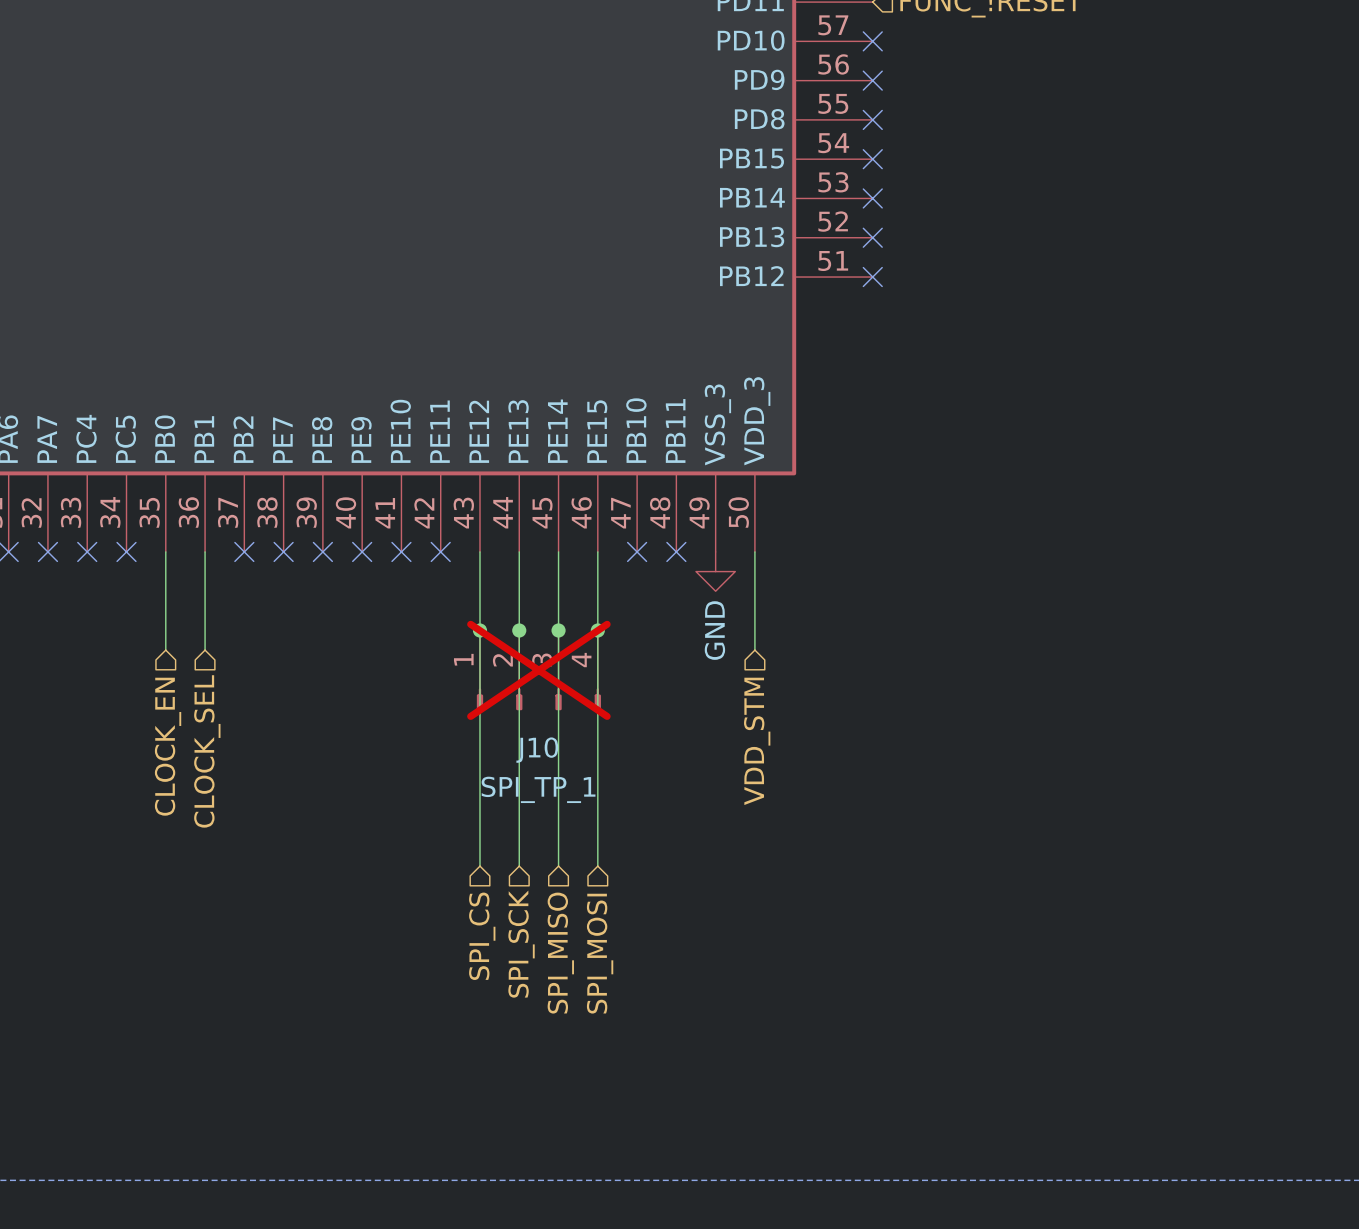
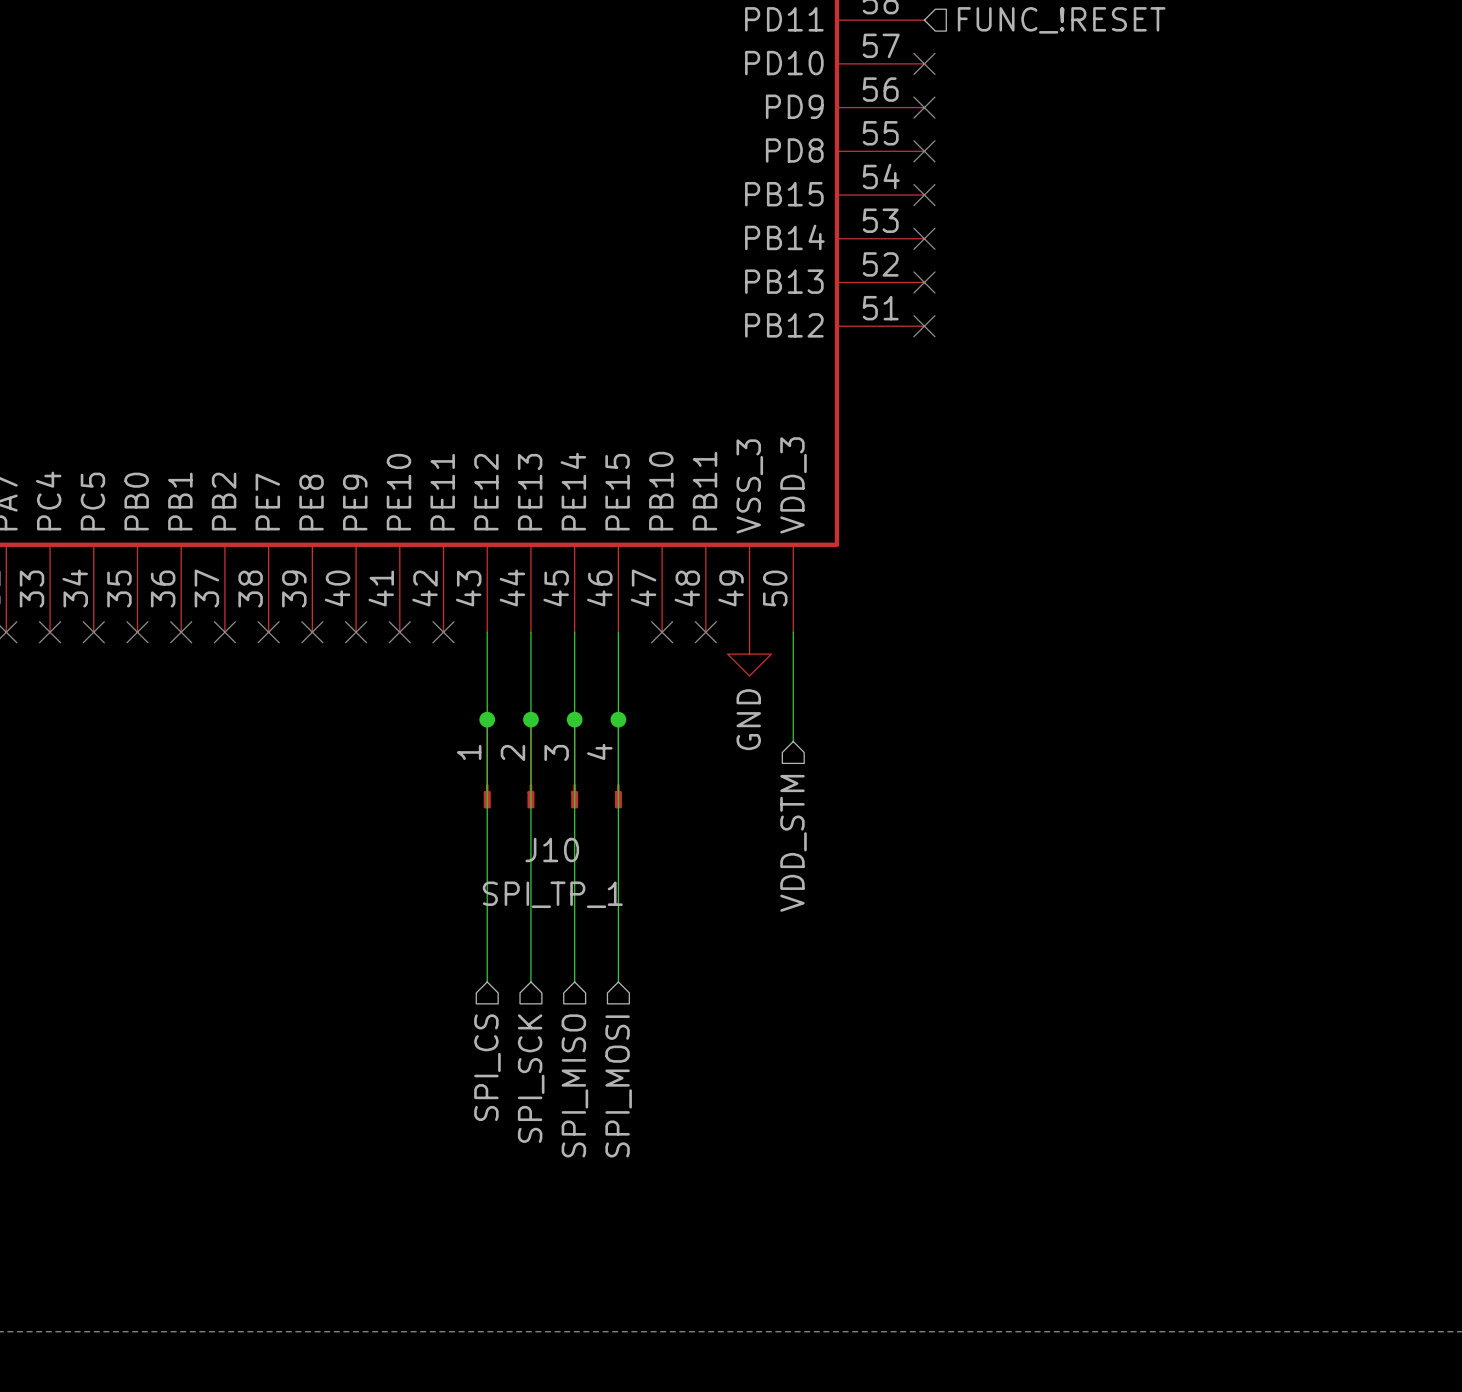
wire: (165, 551) (165, 650) -> none
no-connect mark: none -> (137, 632)
wire: (205, 551) (205, 650) -> none
no-connect mark: none -> (181, 632)
J10 do-not-place cross: (538, 670) -> none
hierarchical label: CLOCK_EN (168, 746) -> none
hierarchical label: CLOCK_SEL (207, 751) -> none

